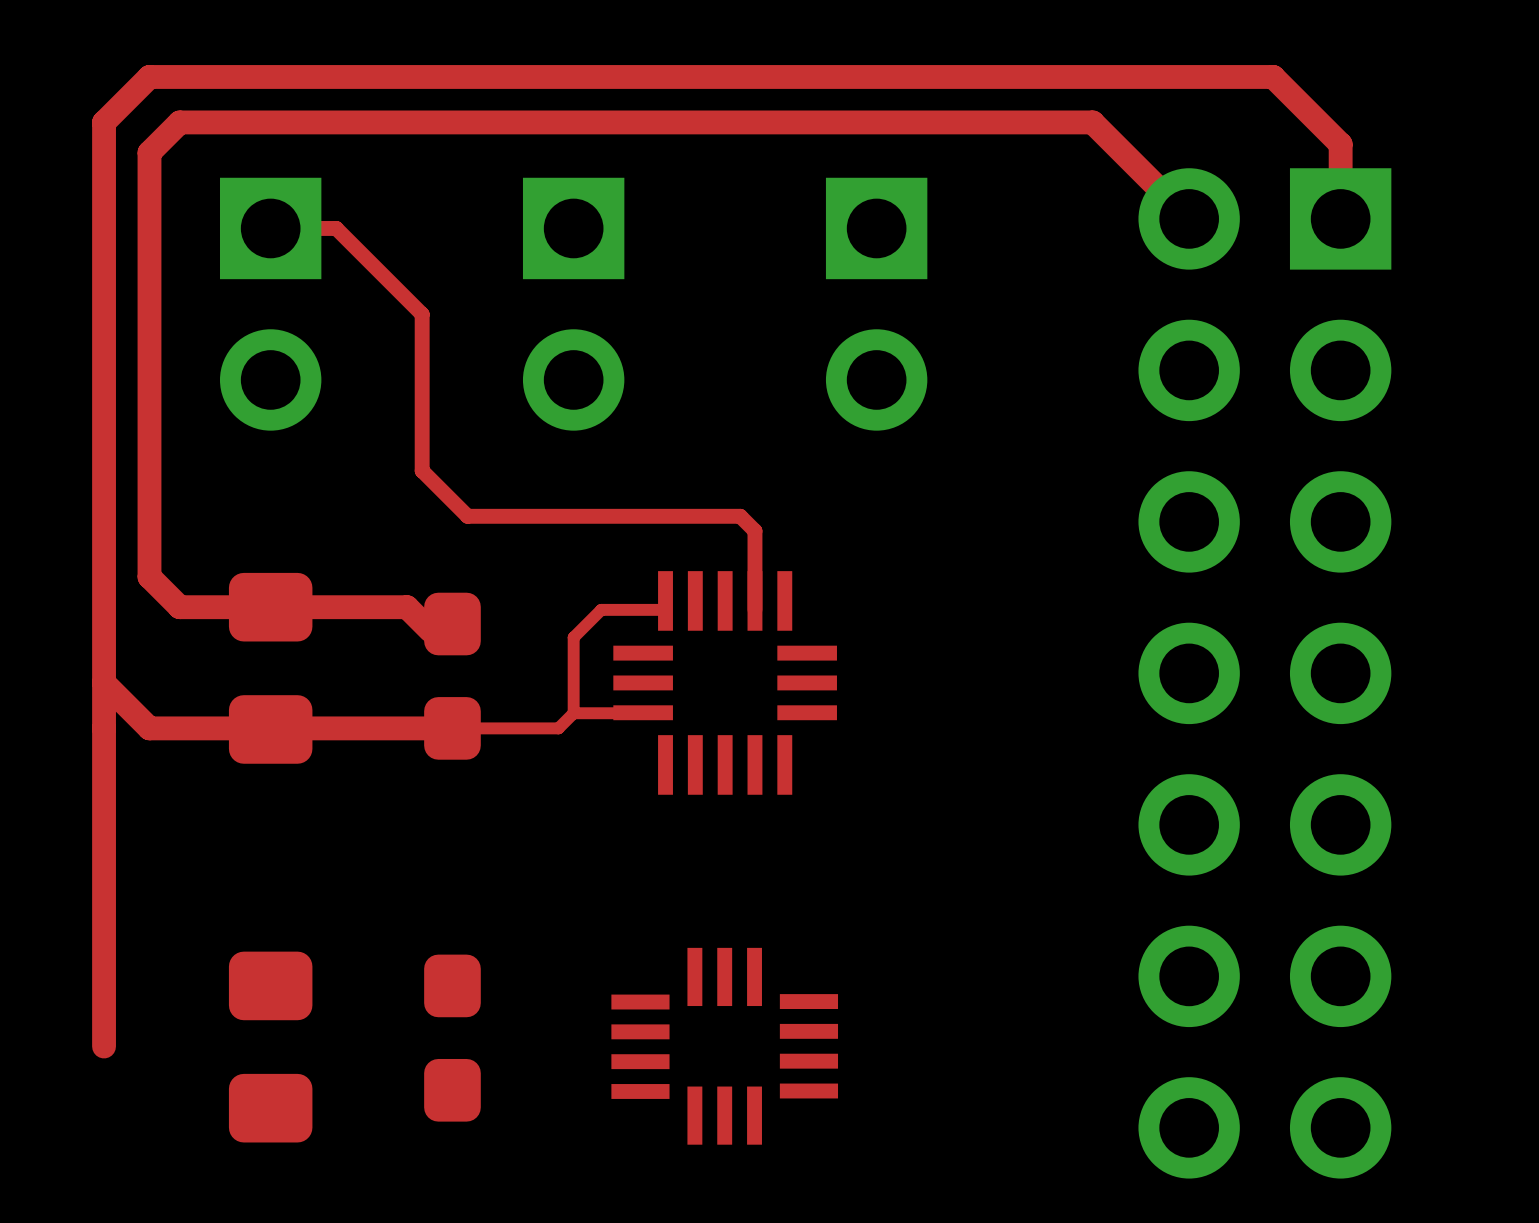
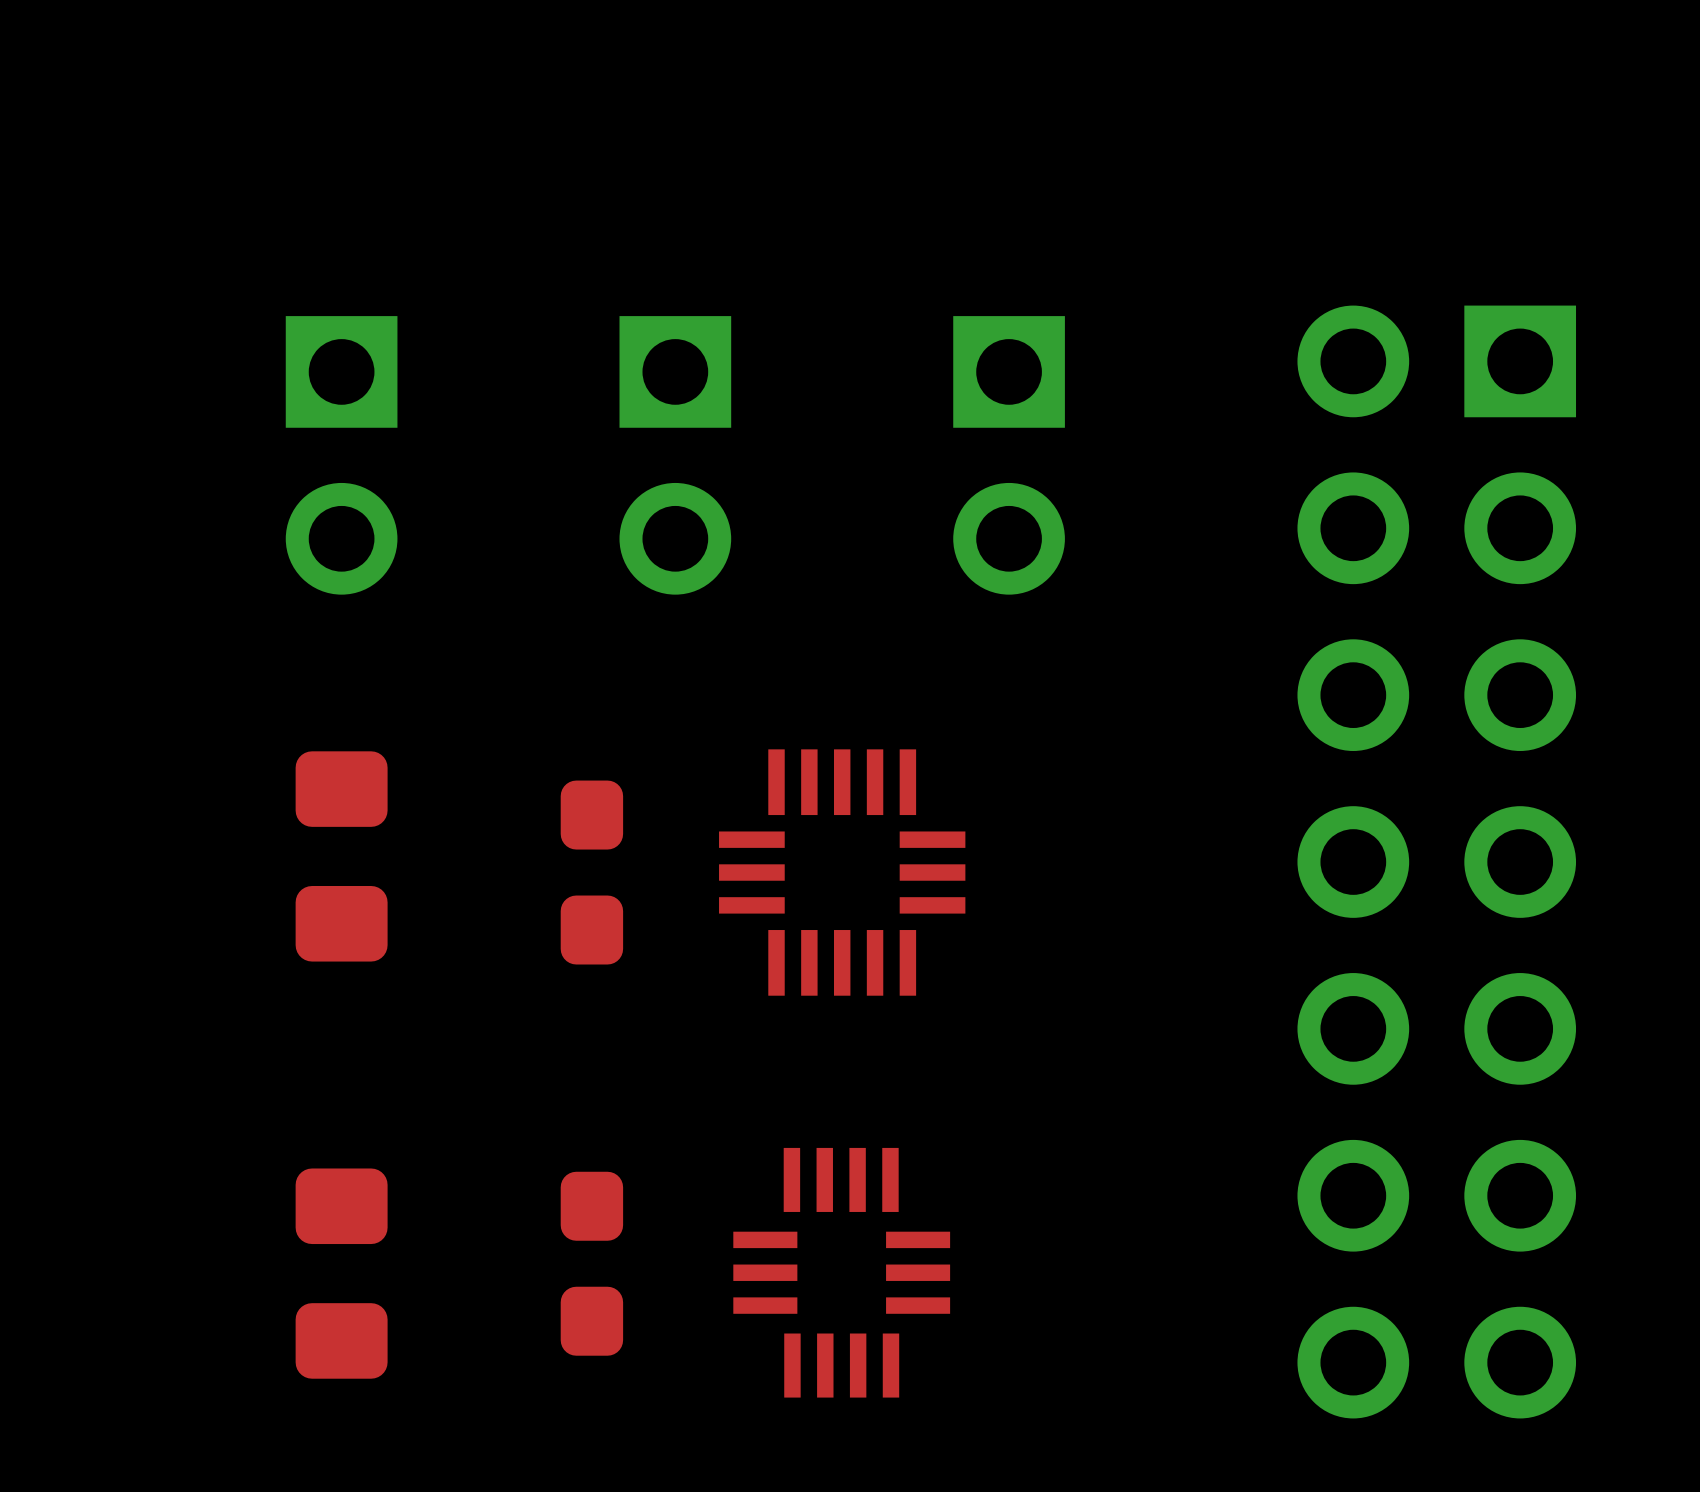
top track: (1189, 218) (1092, 122) (179, 122) (149, 152) (149, 576) (179, 607) (407, 607) (430, 630) -> none
top track: (1340, 218) (1340, 144) (1273, 76) (149, 76) (104, 122) (104, 1046) -> none
top track: (270, 228) (336, 228) (422, 314) (422, 470) (467, 516) (740, 516) (754, 530) (754, 609) -> none
top track: (665, 609) (601, 609) (573, 637) (573, 713) -> none
part position: (452, 676) -> (591, 872)
top track: (104, 682) (149, 728) (452, 728) -> none
top track: (573, 713) (558, 728) (459, 728) -> none
top track: (651, 713) (573, 713) -> none
part position: (452, 1038) -> (591, 1263)
part rotation: 0° (724, 1046) -> 90° clockwise (841, 1272)

